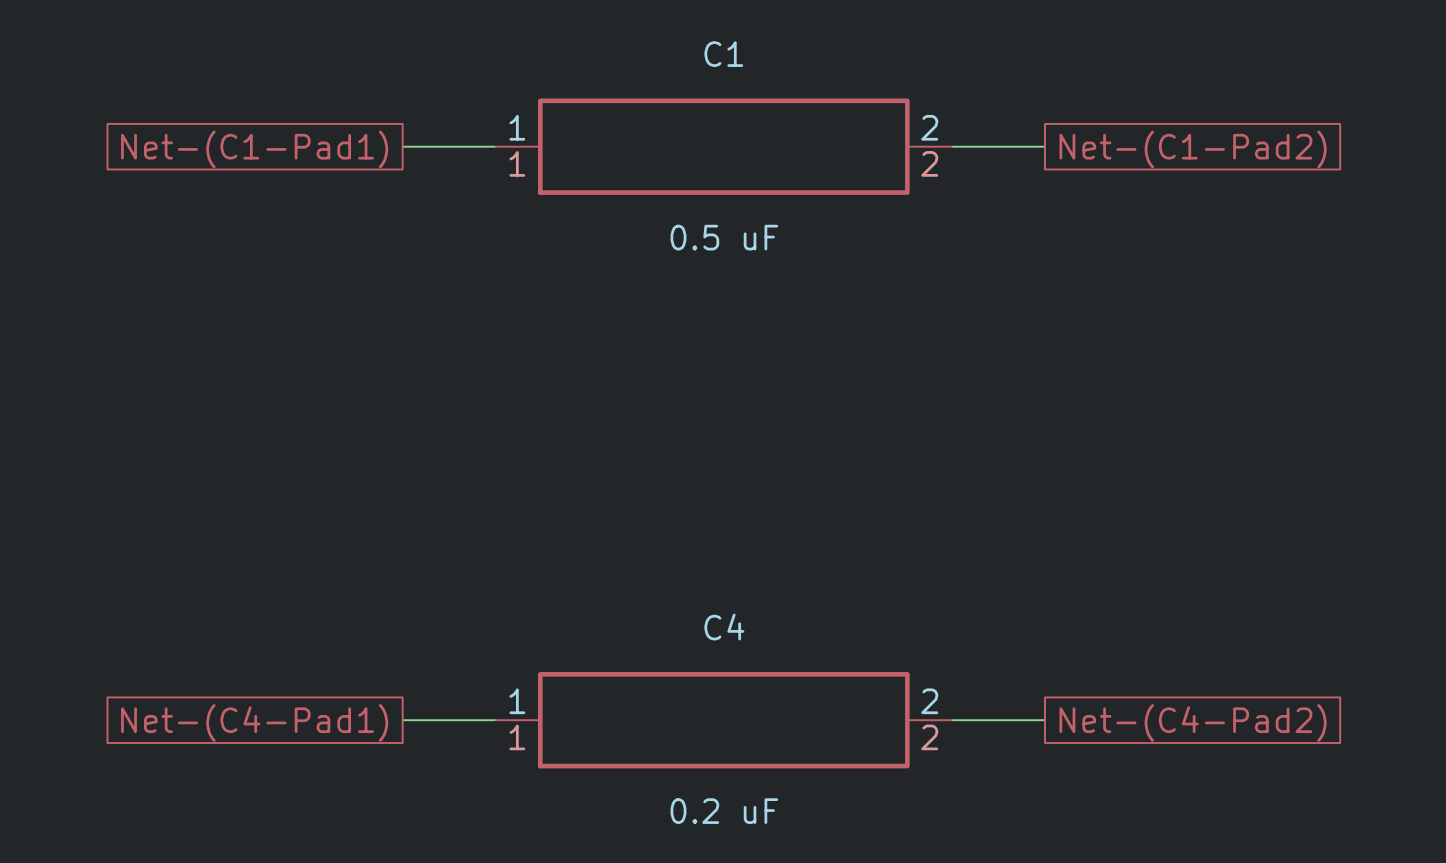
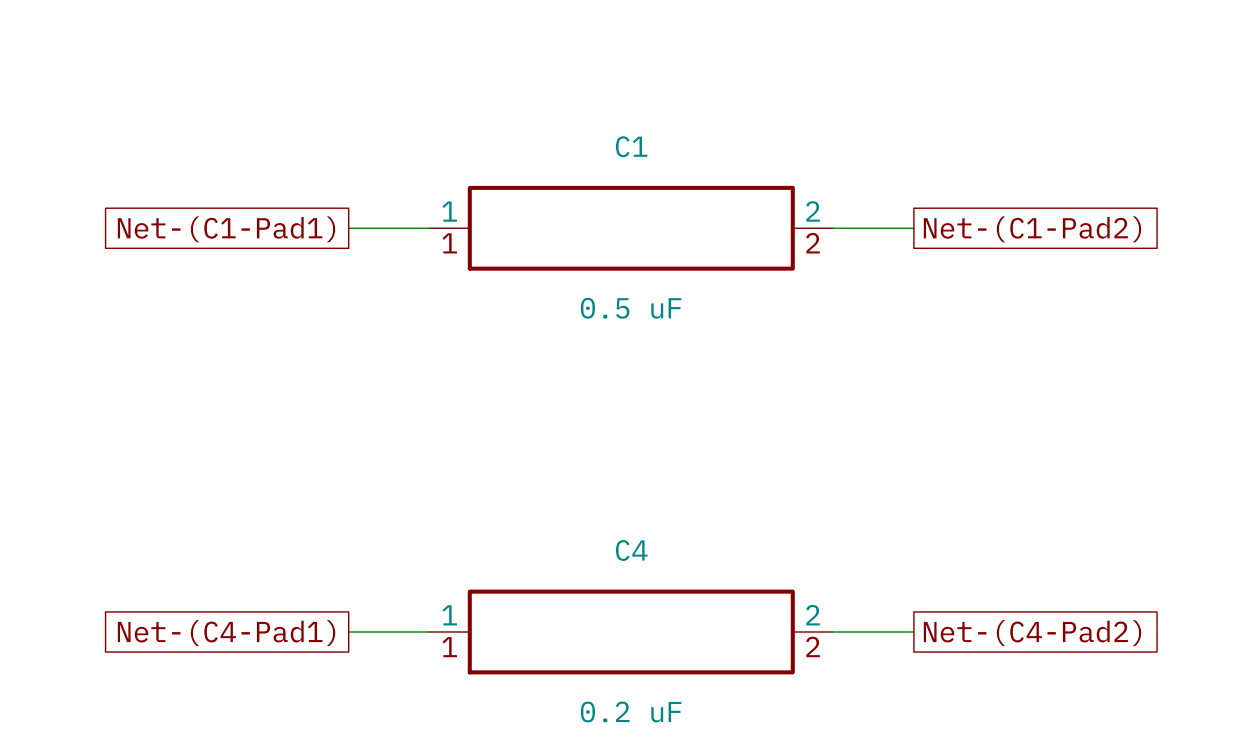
wire: (402, 146) (494, 146) -> (348, 228) (429, 228)
C1 position: (723, 146) -> (631, 228)
wire: (953, 146) (1044, 146) -> (833, 228) (913, 228)
global label position: Net-(C1-Pad1) (254, 149) -> Net-(C1-Pad1) (226, 229)
global label position: Net-(C1-Pad2) (1193, 149) -> Net-(C1-Pad2) (1032, 229)

